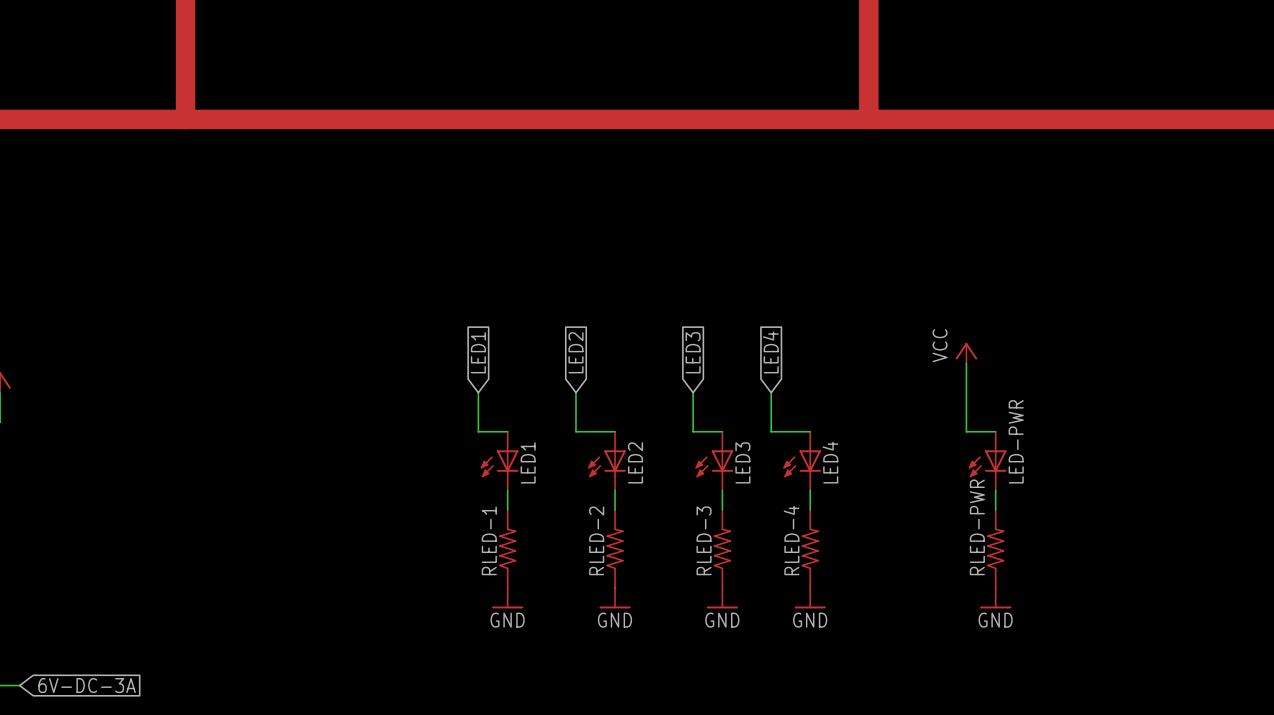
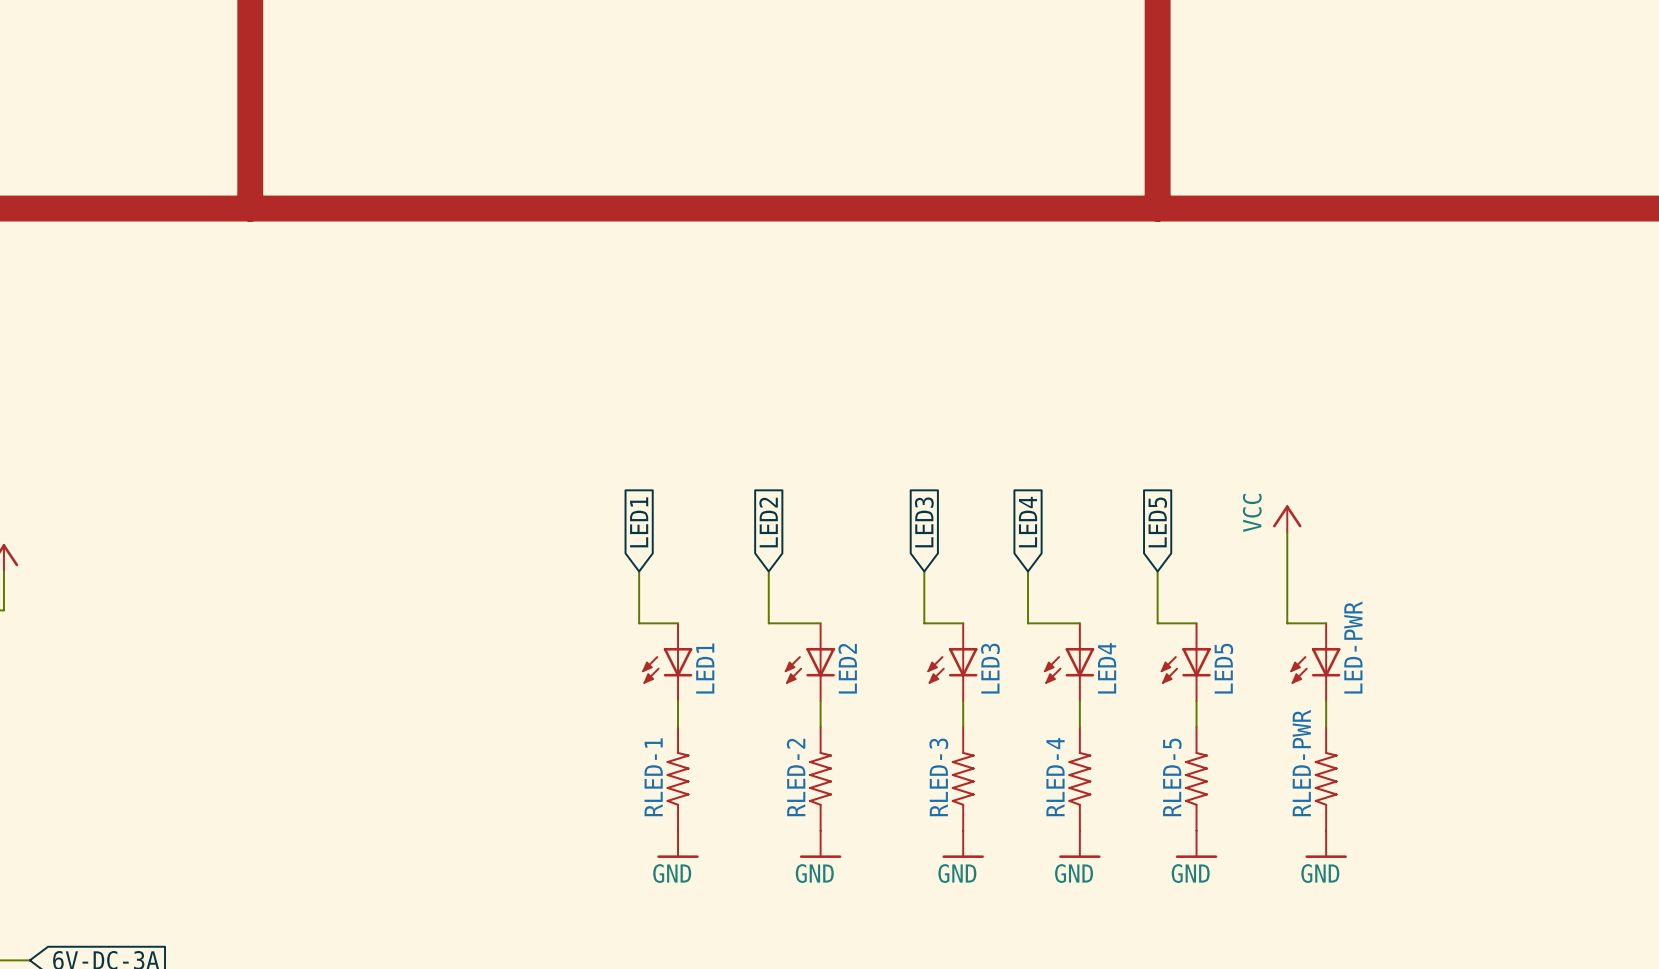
global label: none -> LED5 (1157, 522)
wire: none -> (1157, 571) (1157, 623) (1196, 623)
LED5: none -> (1185, 662)
wire: none -> (1196, 701) (1196, 727)
RLED-5: none -> (1196, 778)
power symbol: none -> GND (1196, 844)

